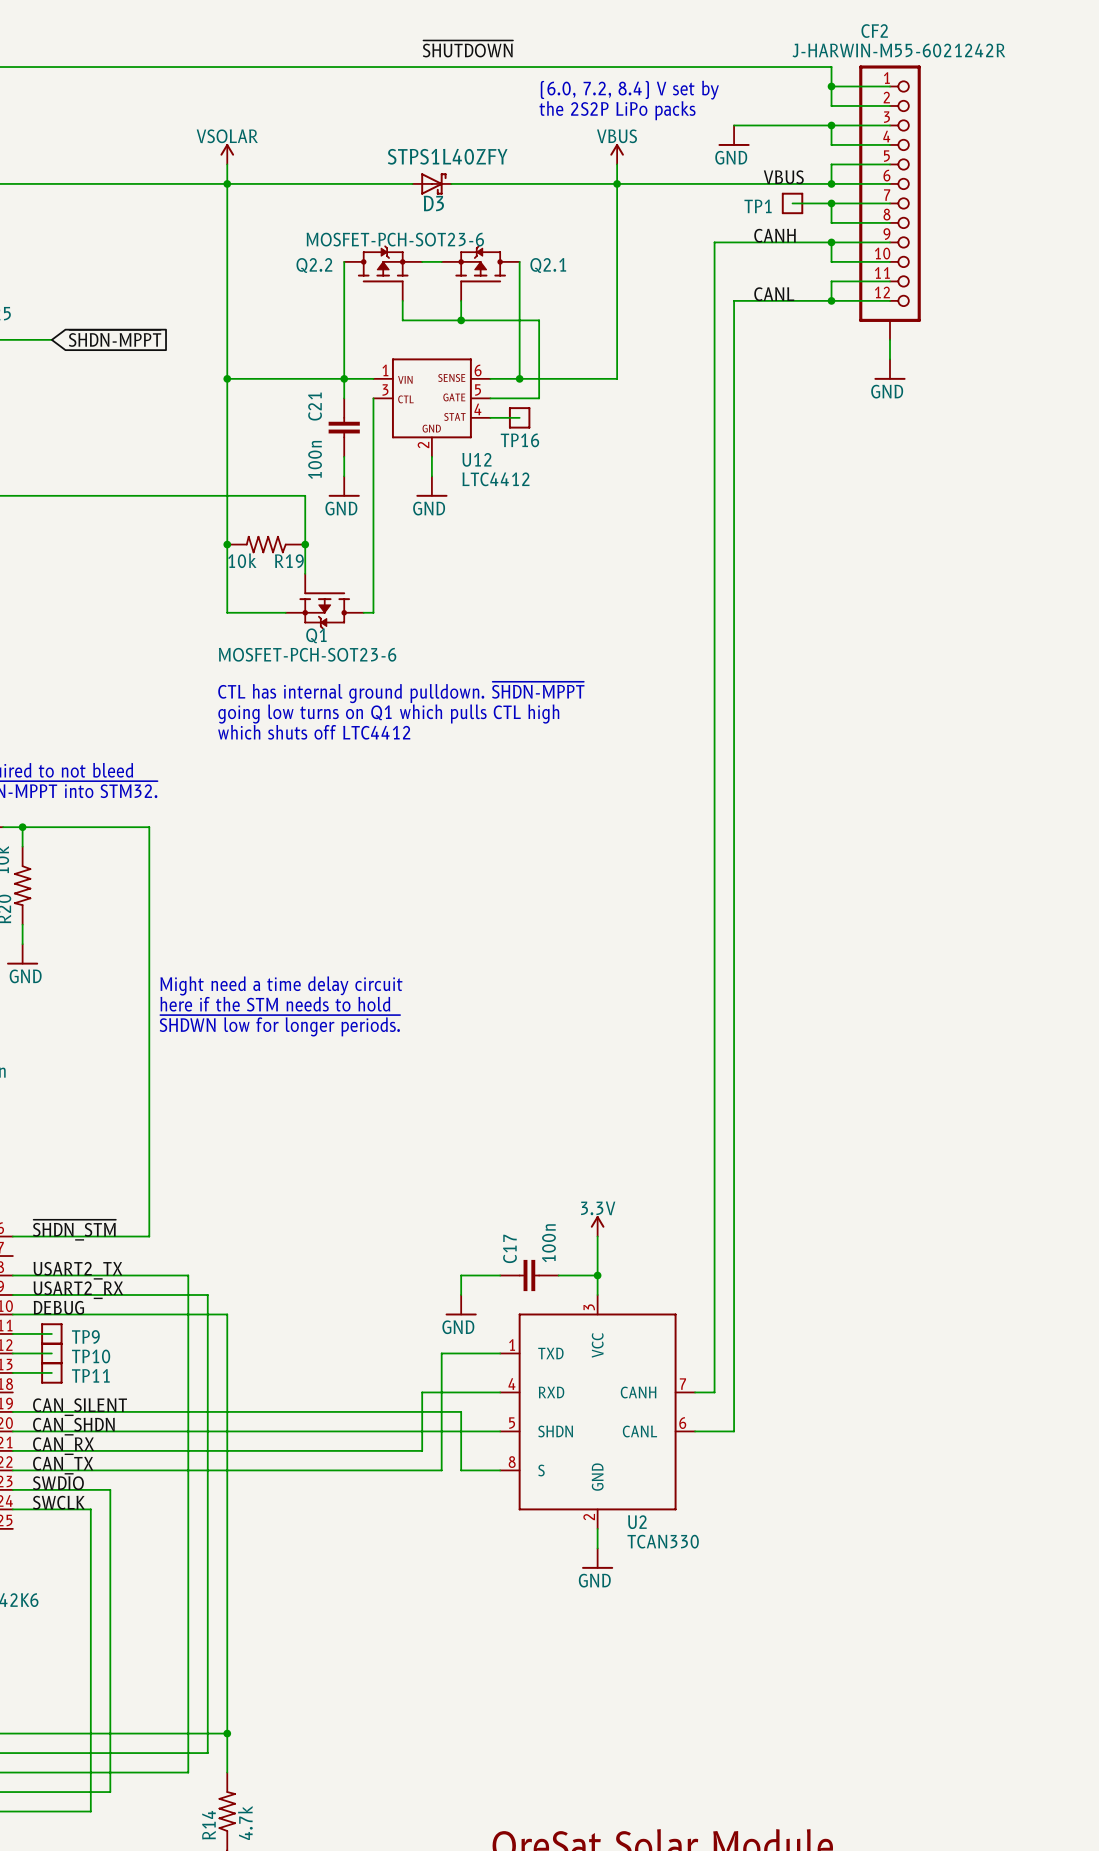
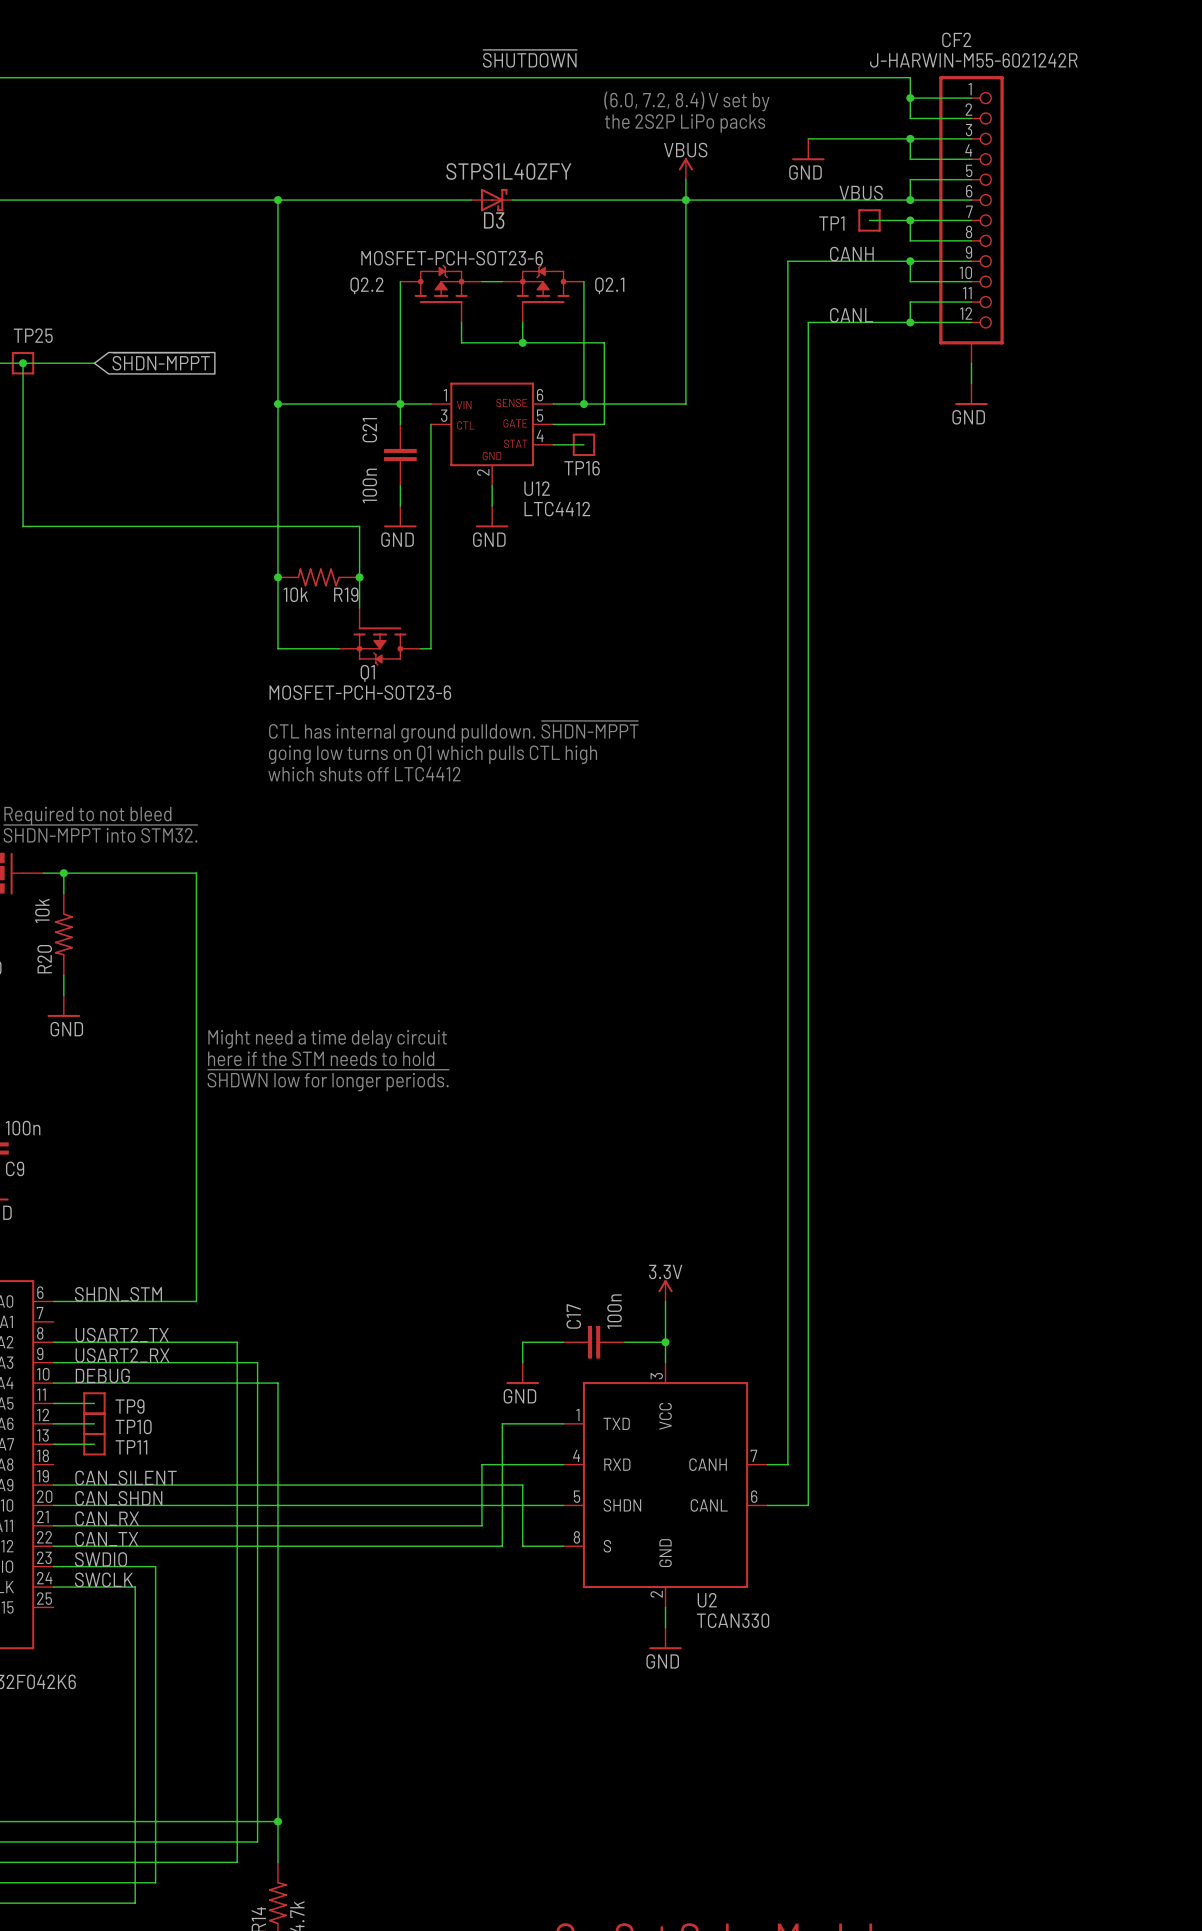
power symbol: VSOLAR (227, 154) -> none
wire: (227, 164) (227, 183) -> none
label: ~{SHDN_STM} (74, 1230) -> SHDN_STM (118, 1294)

